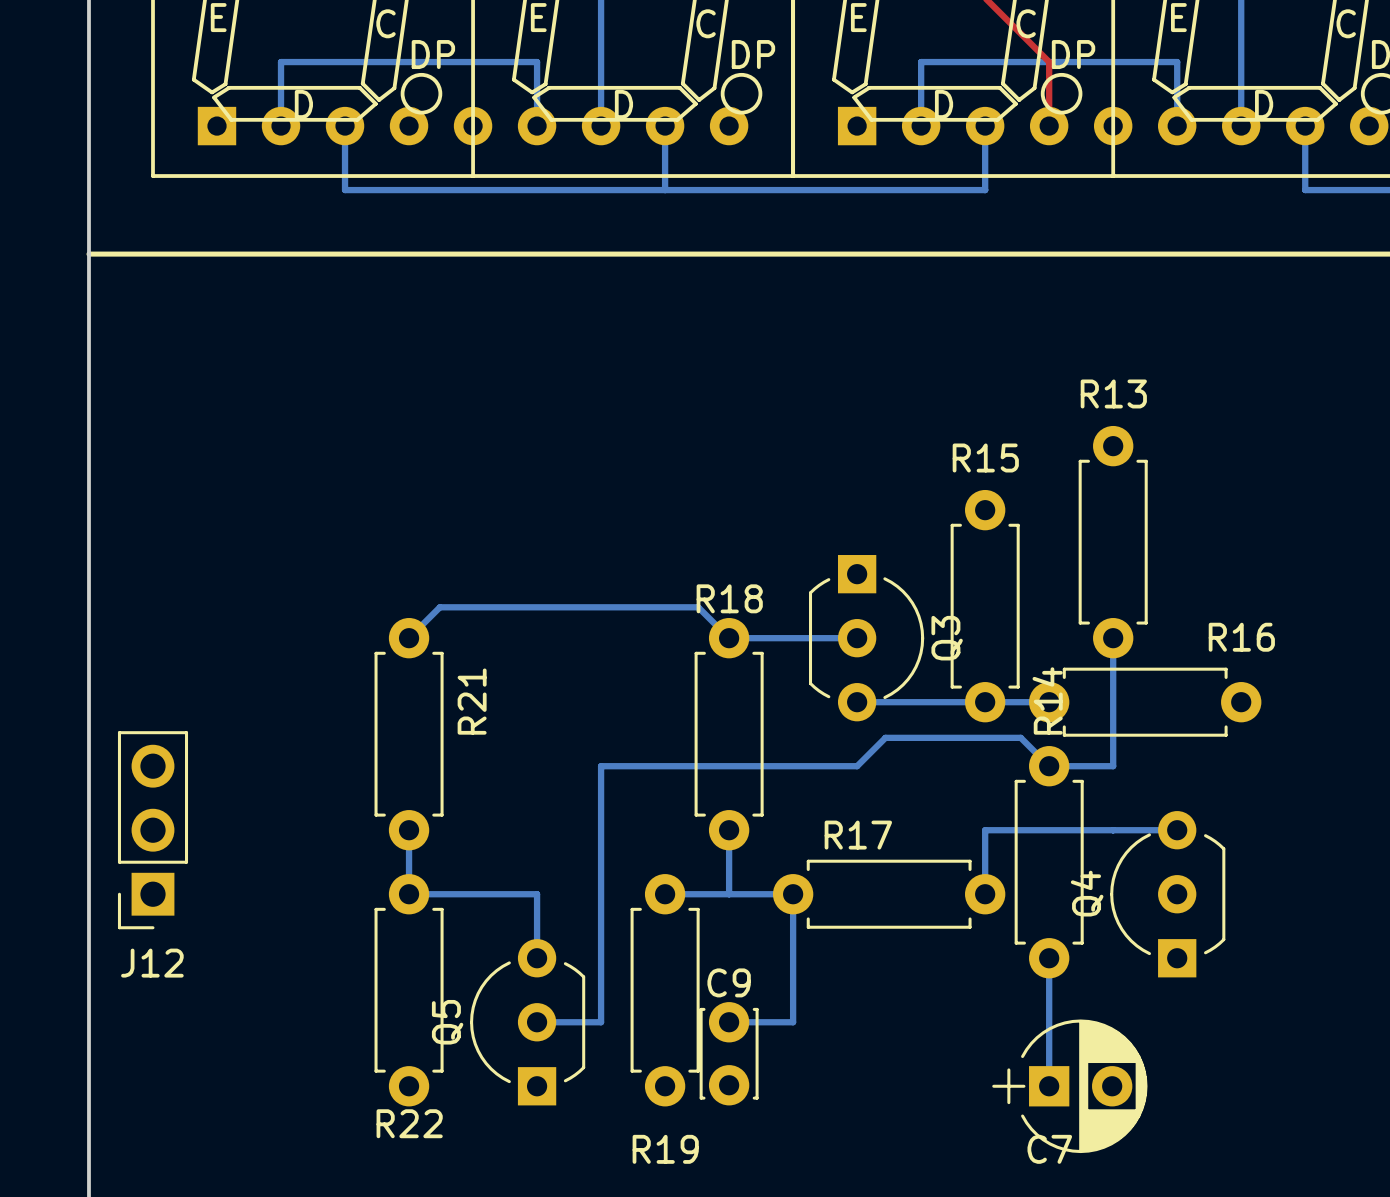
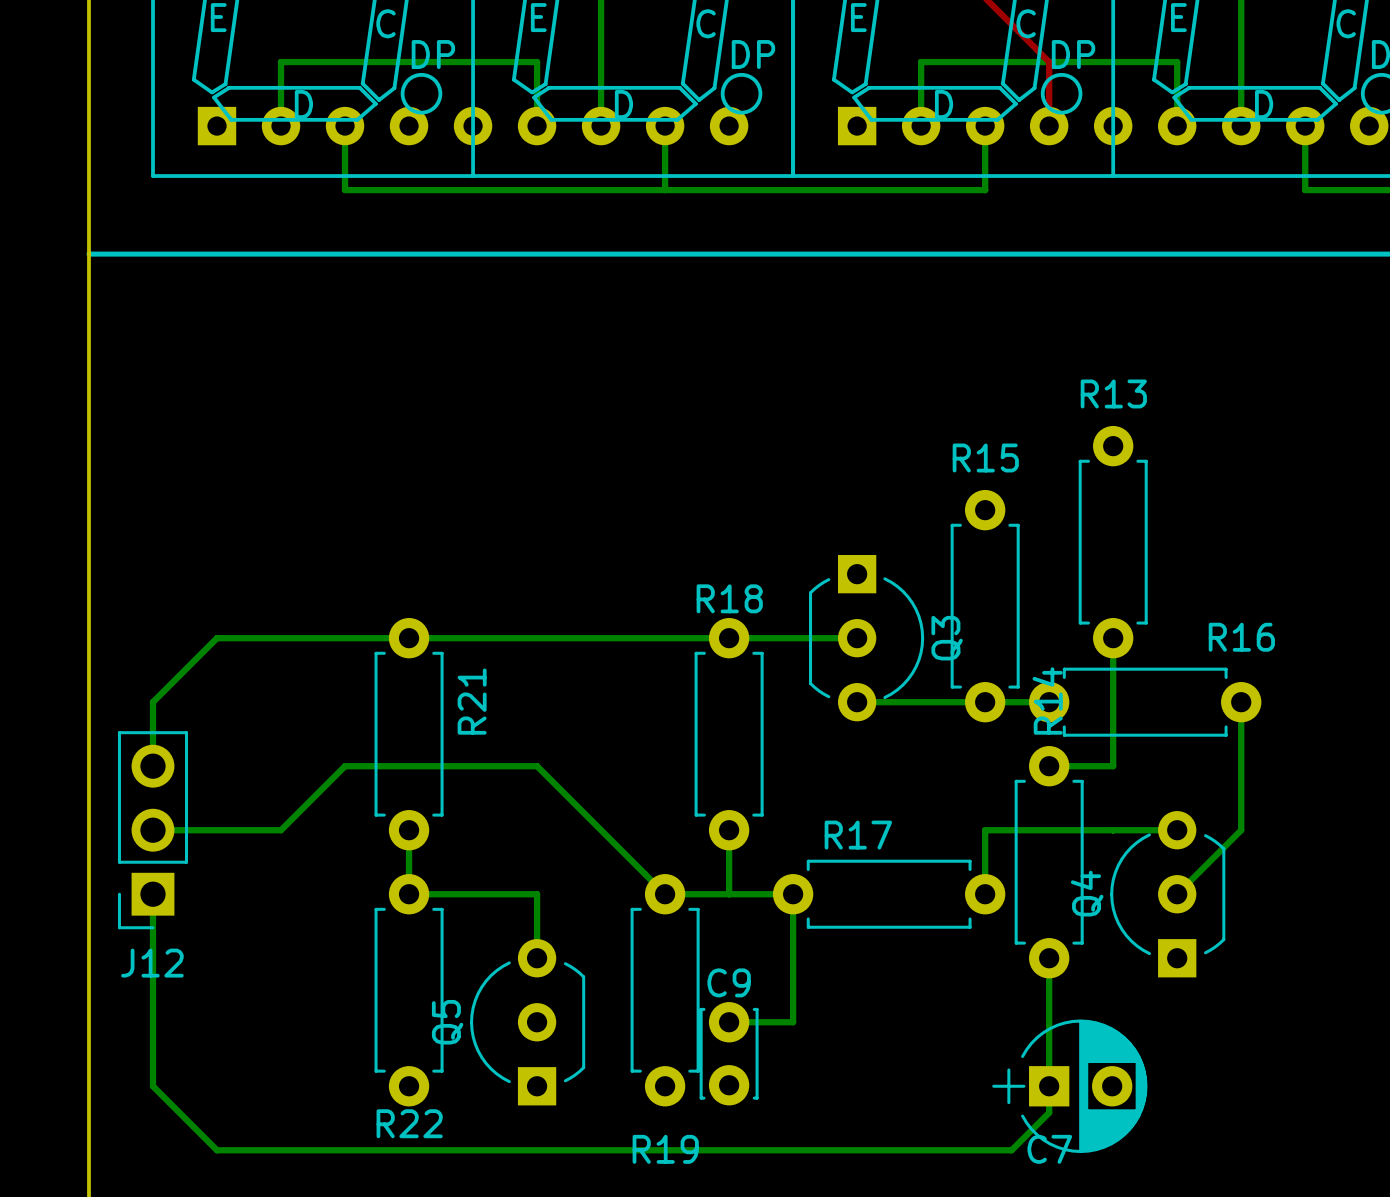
bottom track: (409, 638) (439, 607) (698, 607) (729, 638) -> (152, 766) (152, 702) (217, 638) (729, 638)
bottom track: none -> (1241, 702) (1241, 830) (1177, 894)
bottom track: (1049, 766) (1020, 737) (885, 737) (857, 766) (601, 766) (601, 1022) (537, 1022) -> none
bottom track: none -> (152, 830) (281, 830) (345, 766) (537, 766) (665, 894)
bottom track: none -> (152, 894) (152, 1086) (217, 1150) (1011, 1150) (1049, 1112) (1049, 1086)

